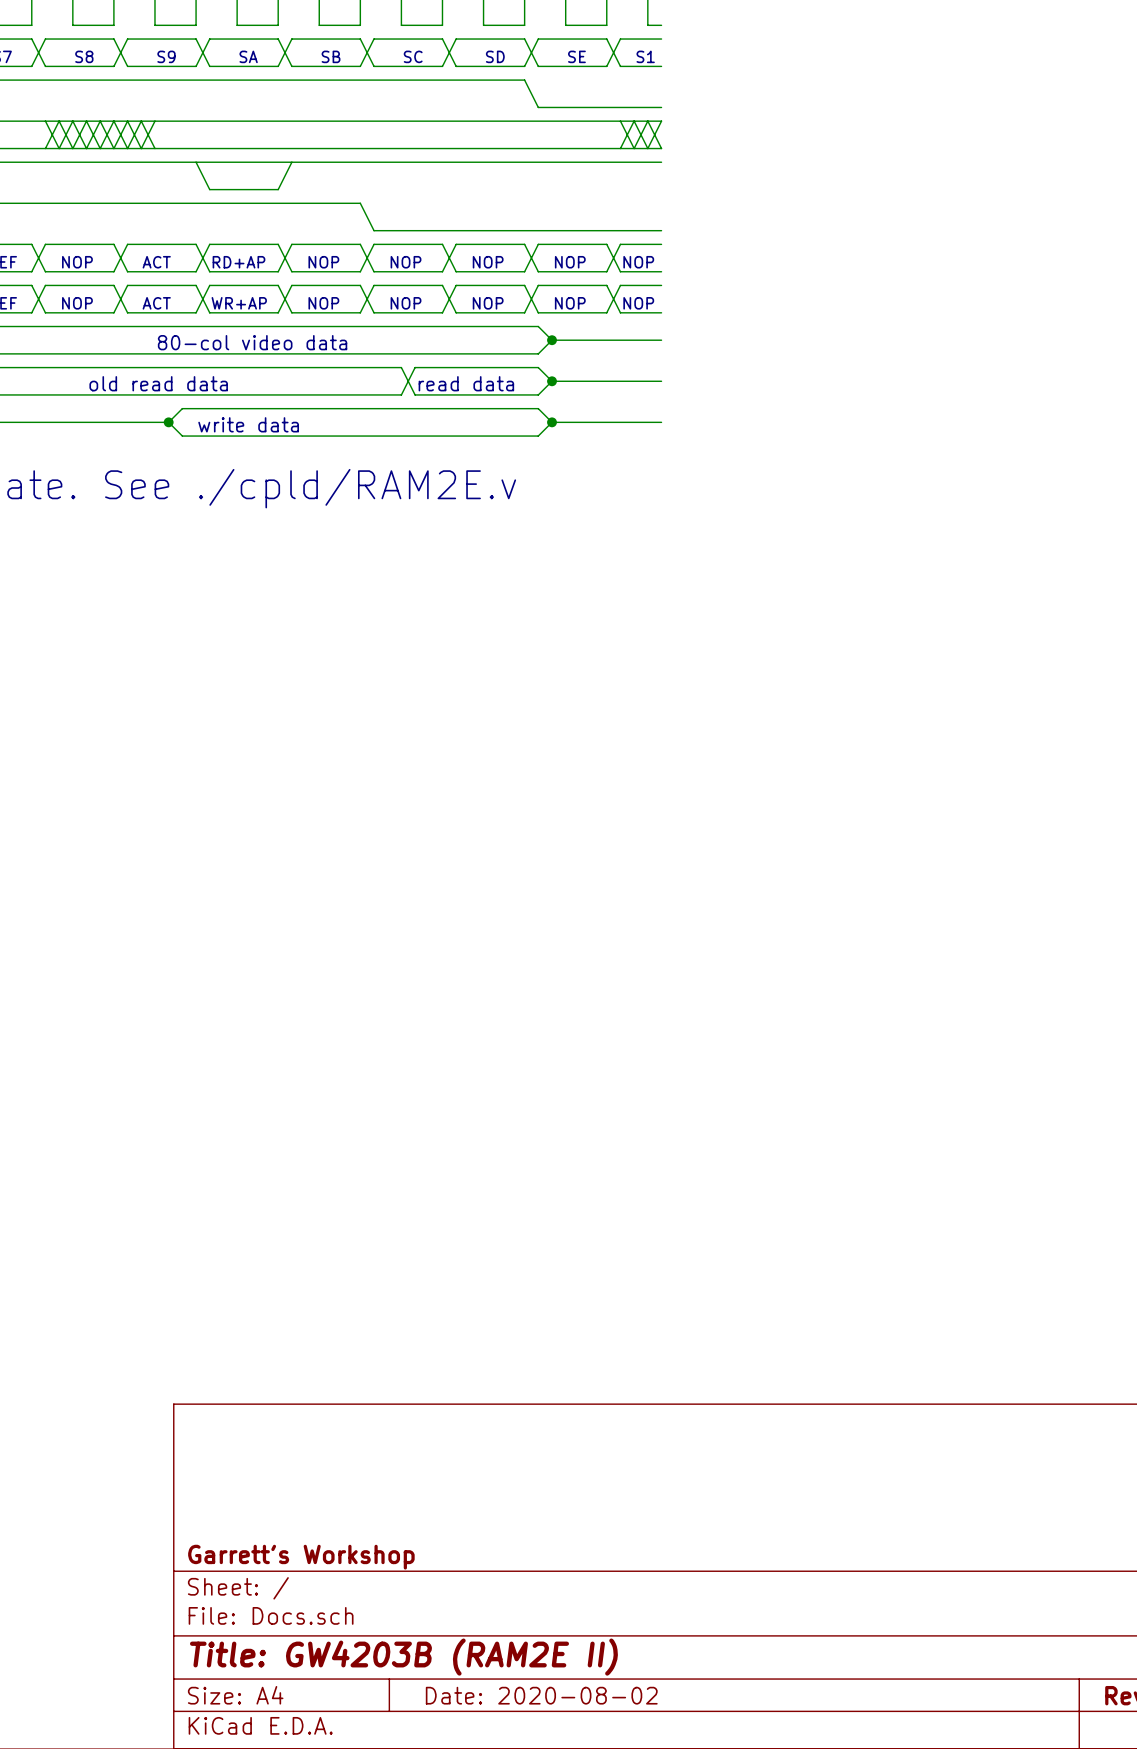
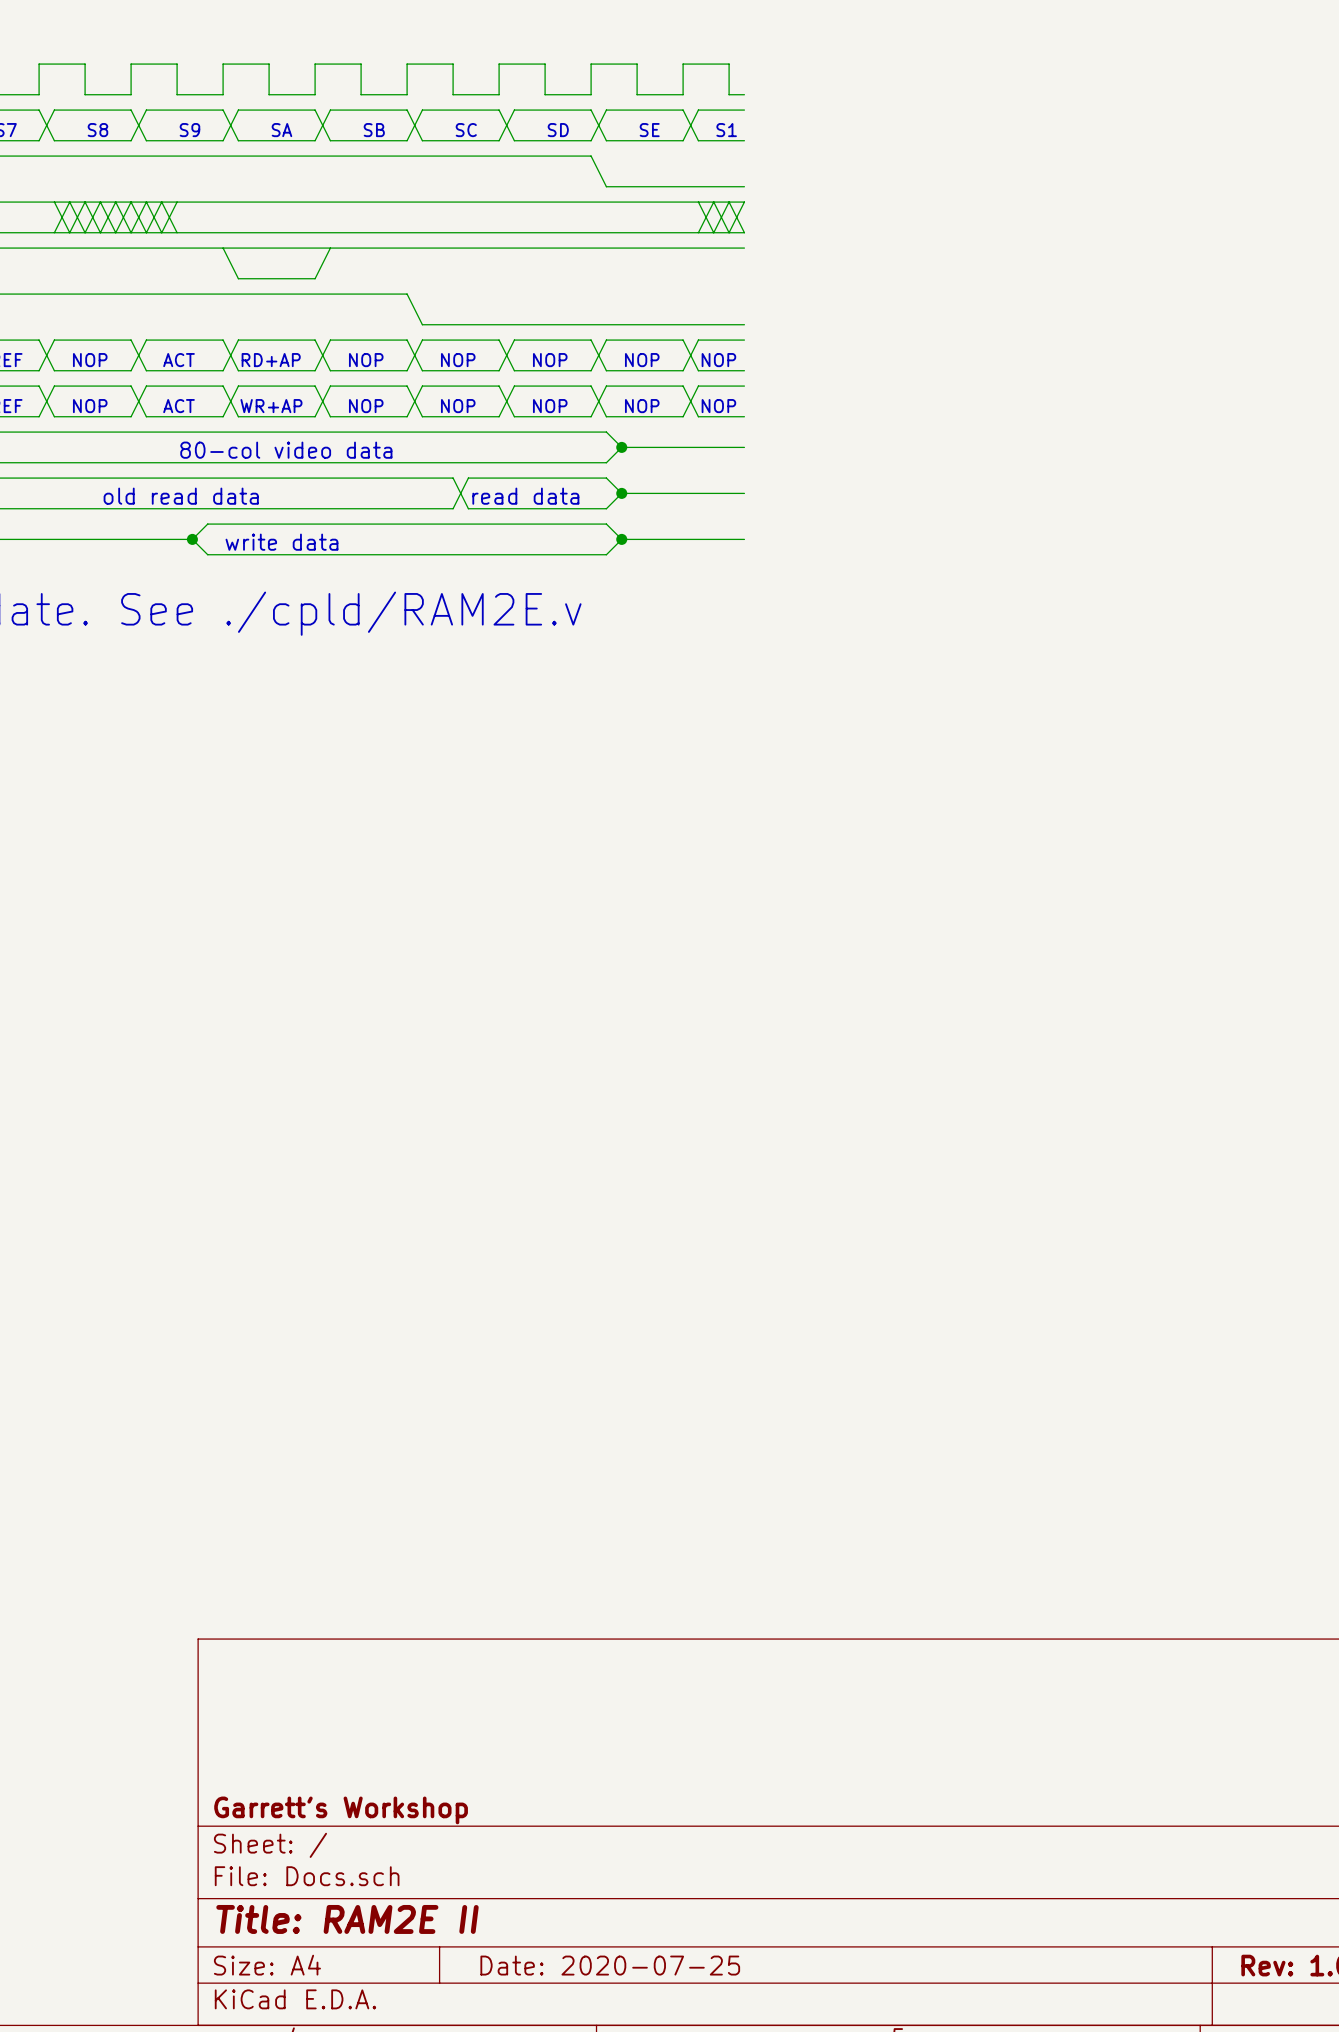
title block: Title: GW4203B (RAM2E II) (403, 1657) -> Title: RAM2E II (347, 1919)
title block: Date: 2020-08-02 (541, 1695) -> Date: 2020-07-25 (610, 1965)

